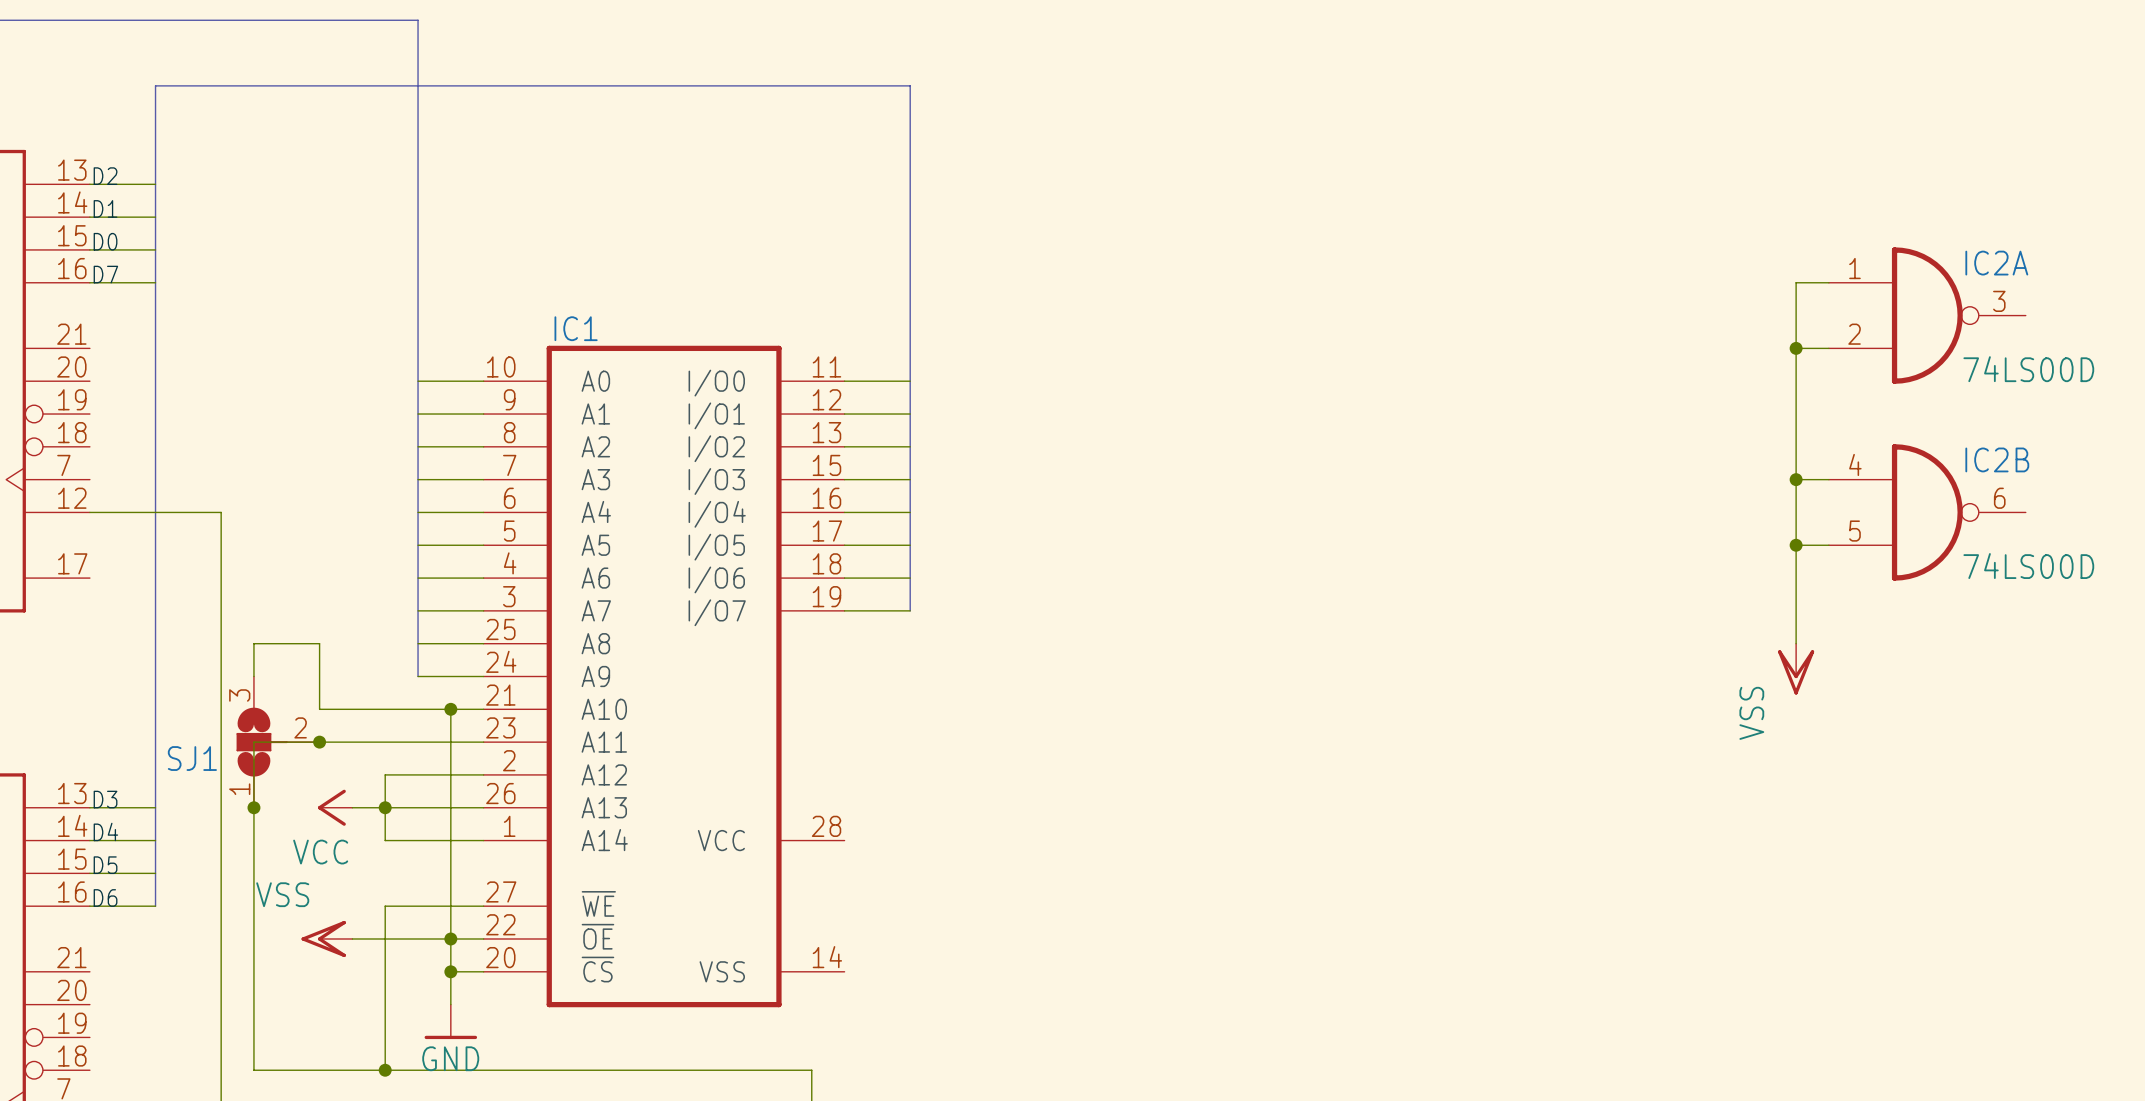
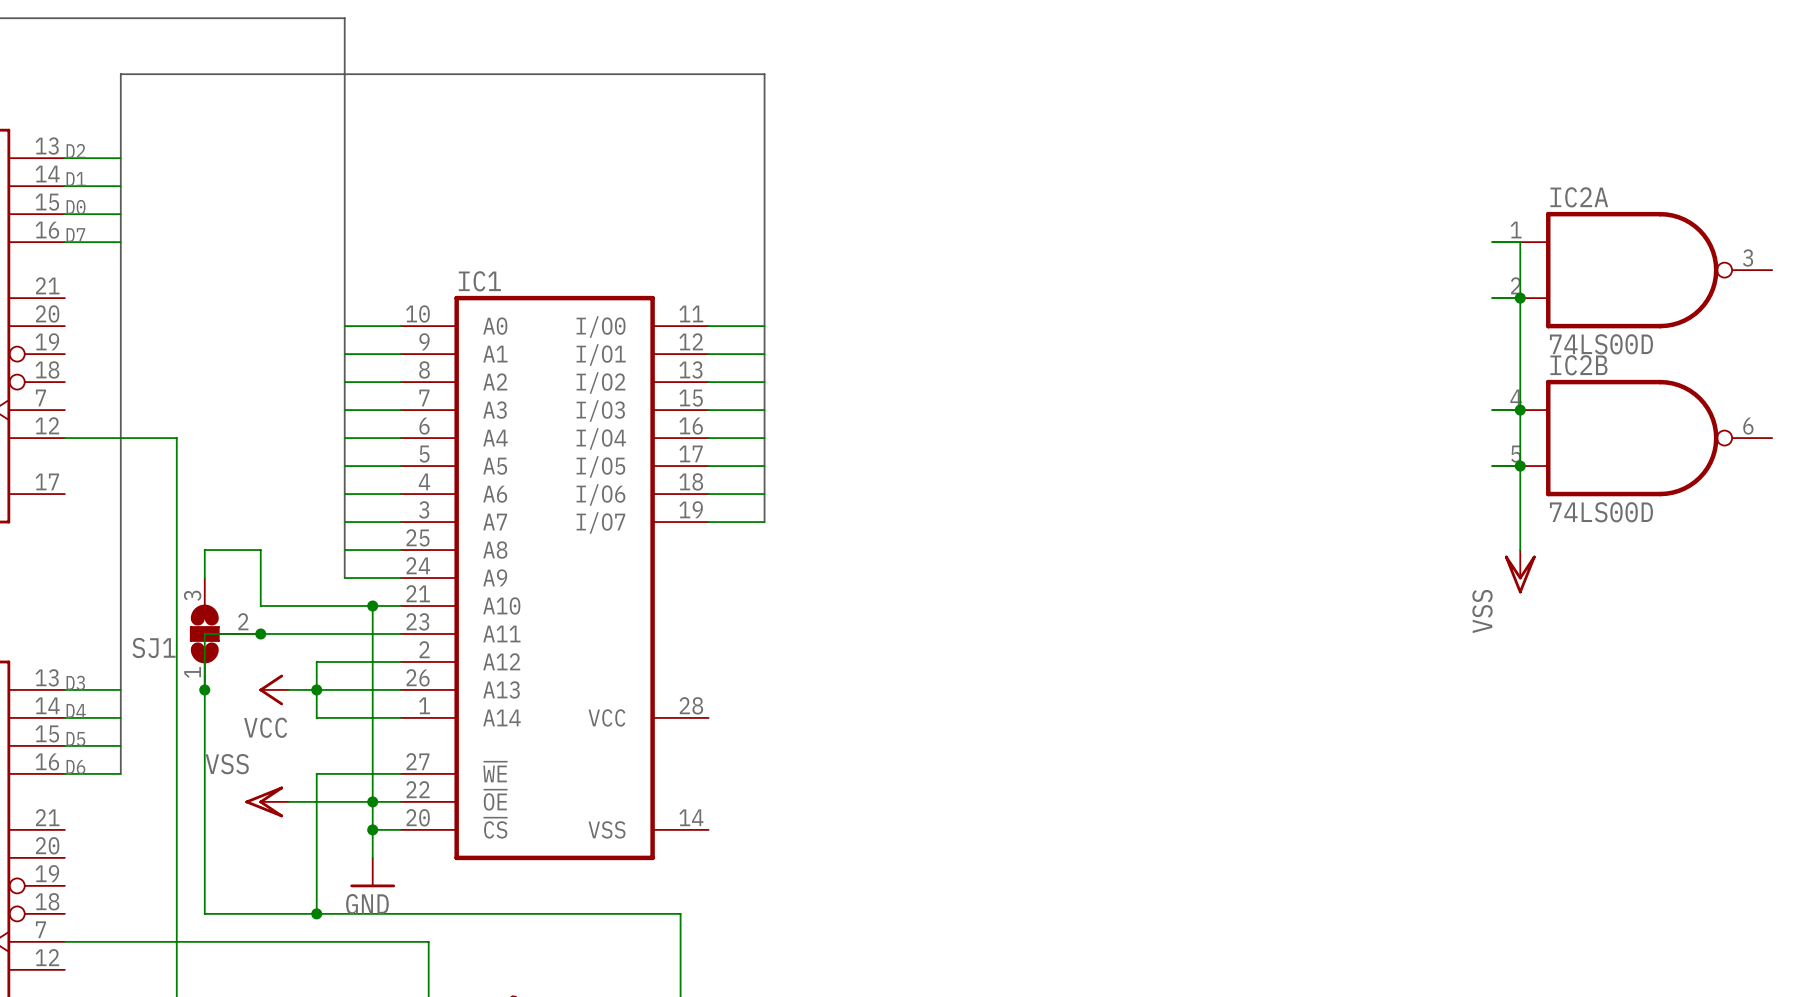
IC2A symbol: [1828, 247, 2026, 384] -> [1492, 211, 1773, 329]
IC2A name position: IC2A (1996, 263) -> IC2A (1579, 197)
IC2A value position: 74LS00D (2028, 369) -> 74LS00D (1601, 344)
IC2B symbol: [1828, 444, 2026, 581] -> [1492, 379, 1773, 497]
IC2B name position: IC2B (1997, 459) -> IC2B (1578, 365)
IC2B value position: 74LS00D (2028, 566) -> 74LS00D (1601, 512)

